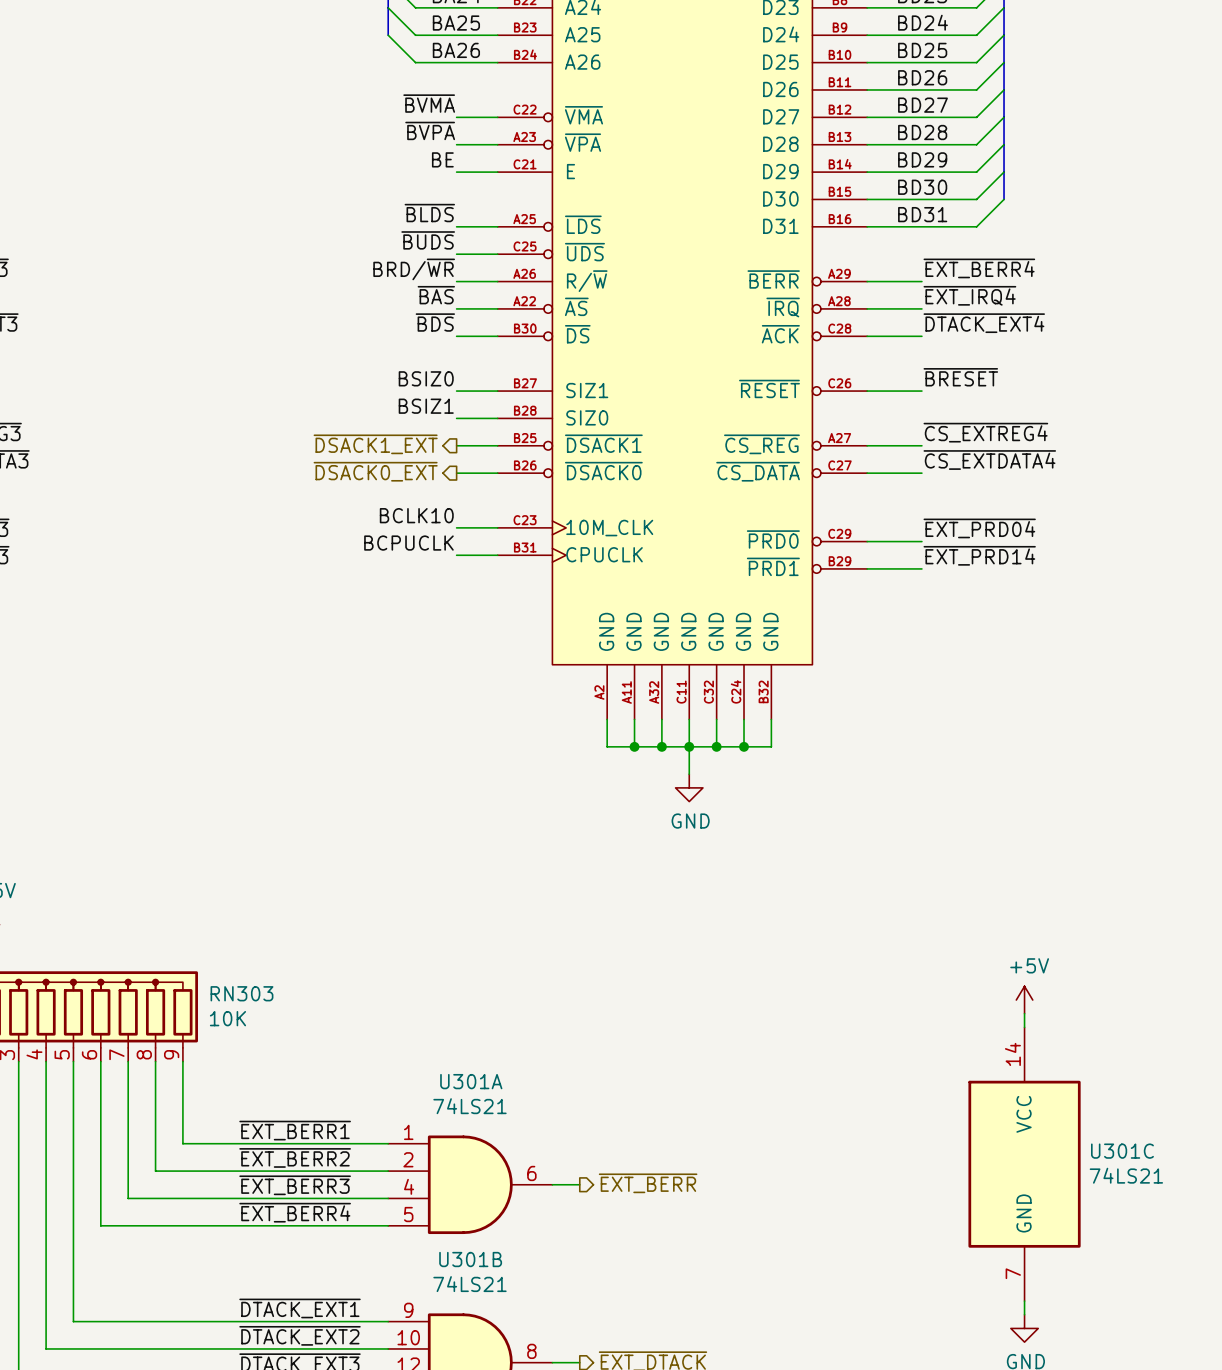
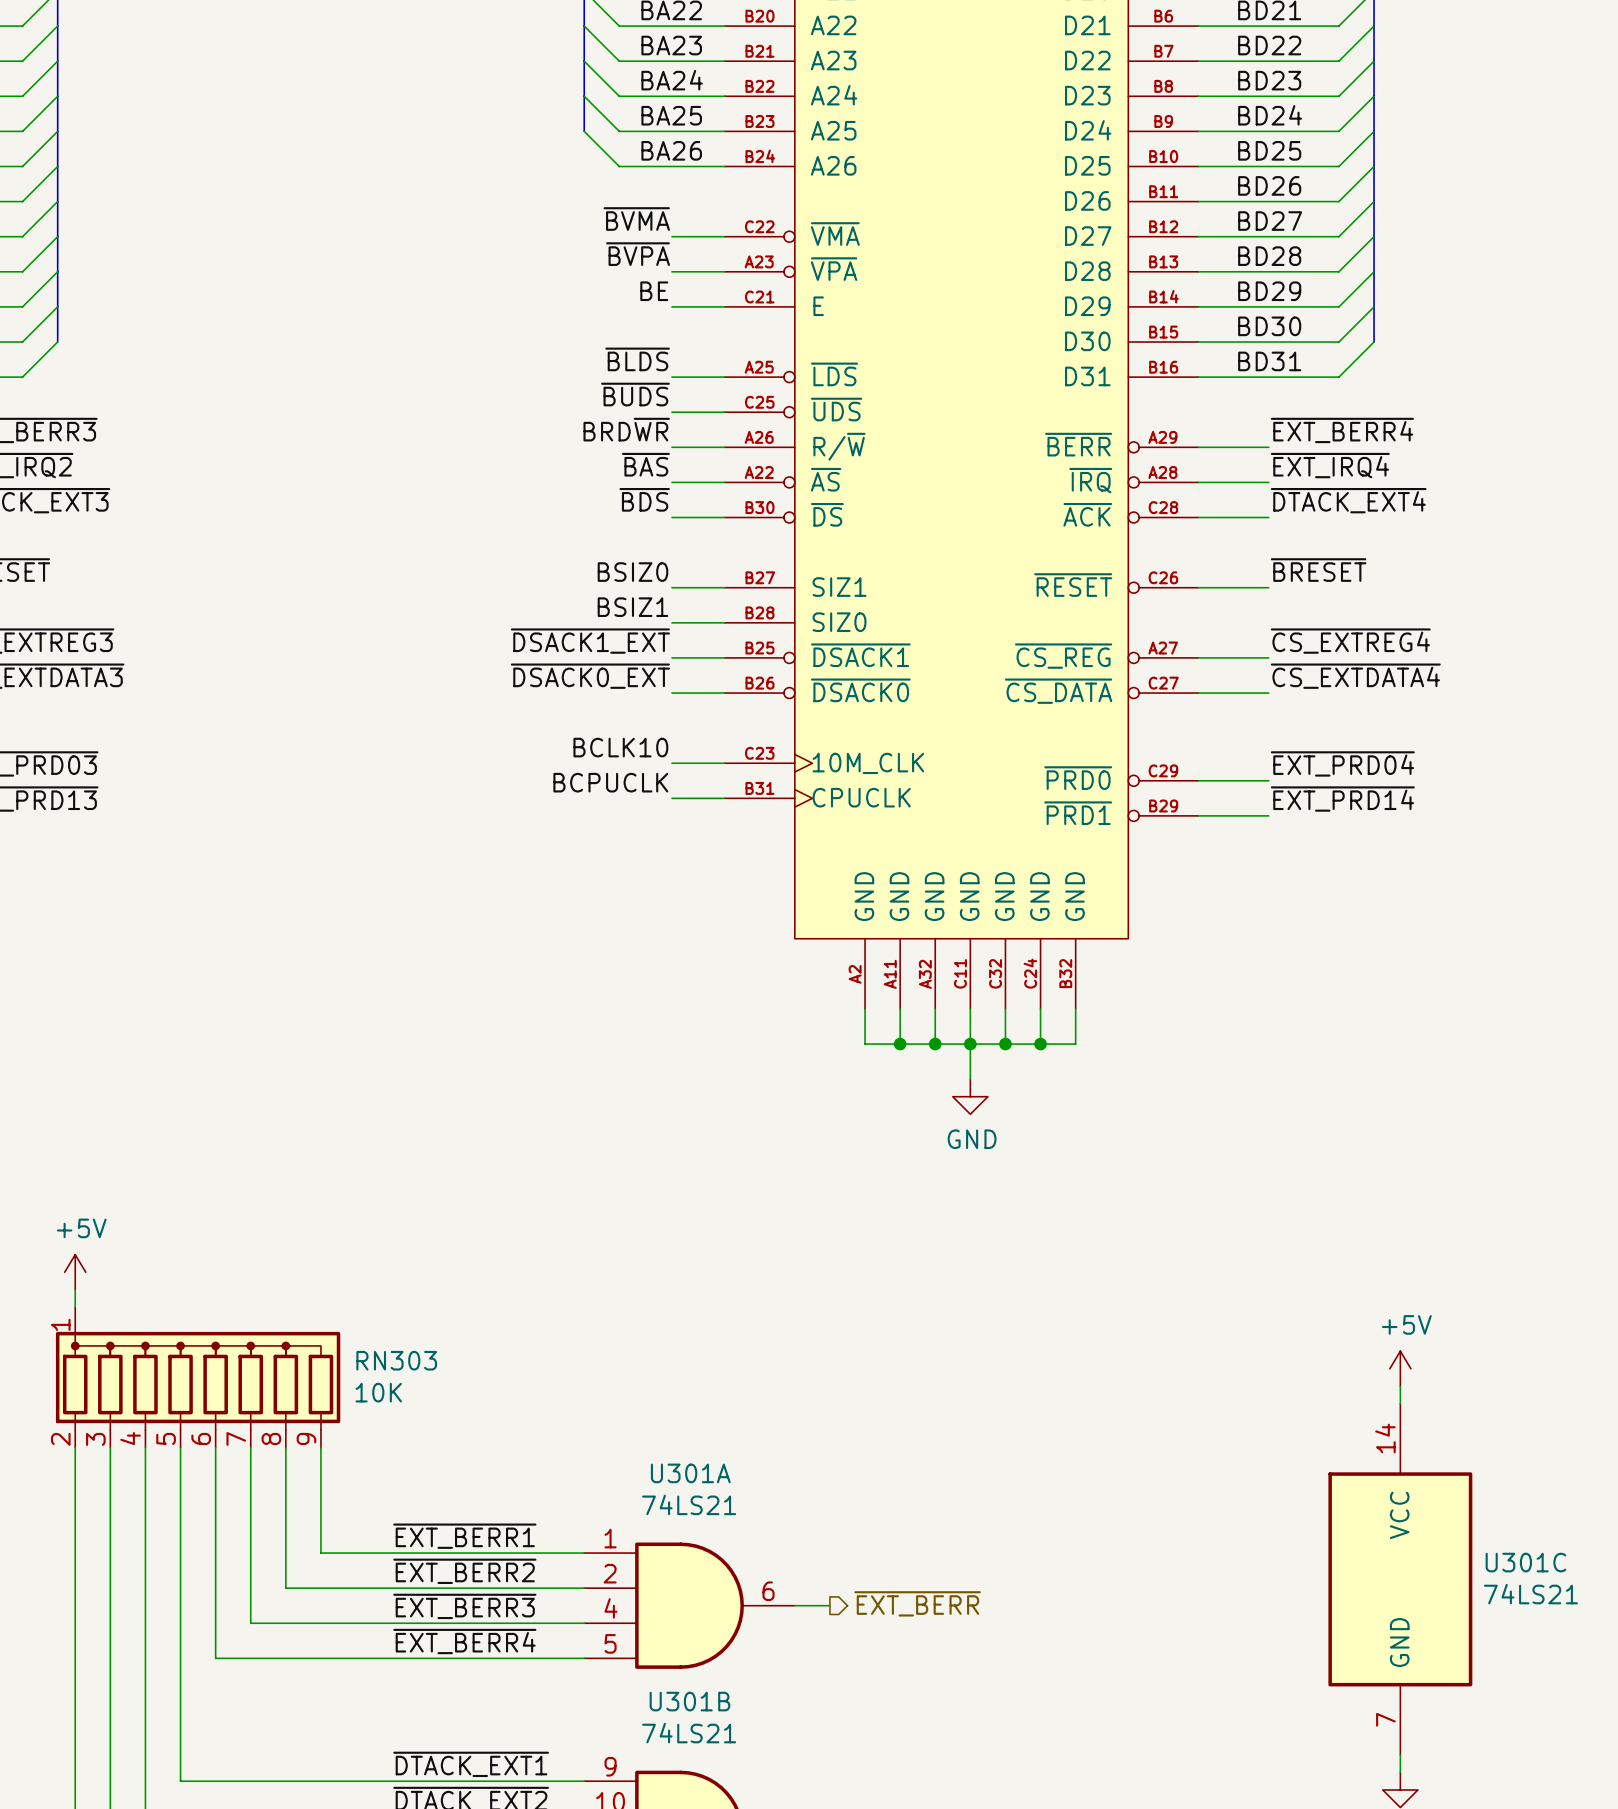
label: BRD/~{WR} (414, 269) -> BRD~{WR} (626, 429)
label: none -> ~{DSACK1_EXT} (590, 641)
hierarchical label: ~{DSACK1_EXT} (375, 444) -> none
label: none -> ~{DSACK0_EXT} (590, 676)
hierarchical label: ~{DSACK0_EXT} (375, 471) -> none

